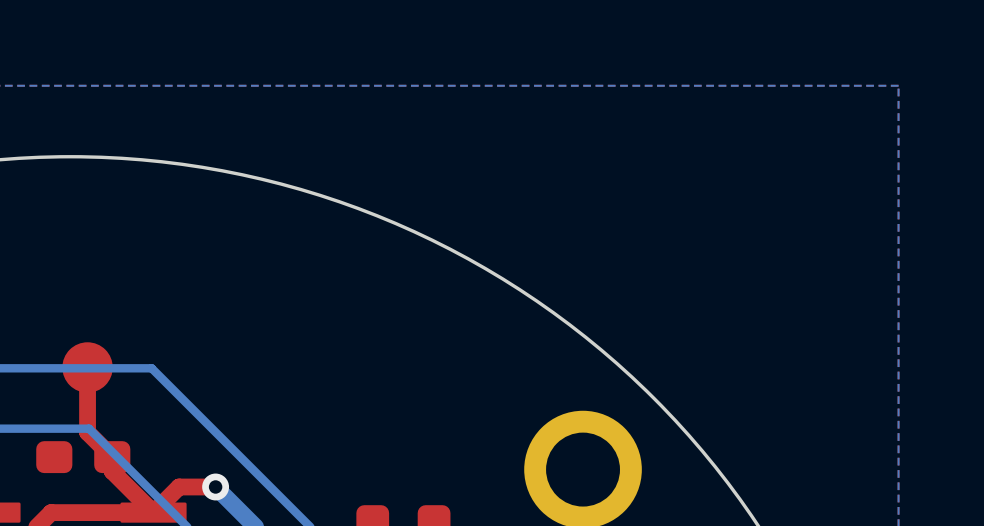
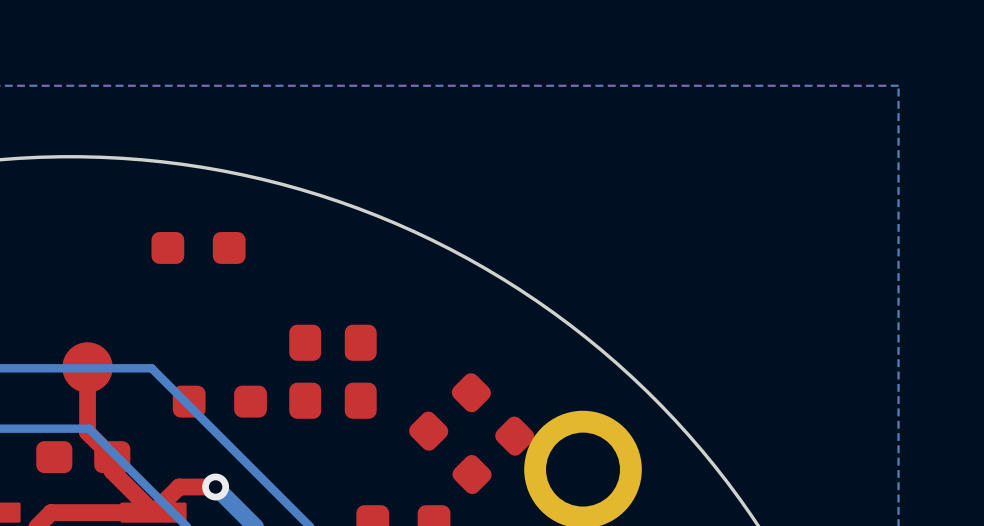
part: none -> (198, 247)
part: none -> (305, 371)
part: none -> (360, 371)
part: none -> (219, 401)
part: none -> (493, 414)
part: none -> (450, 452)

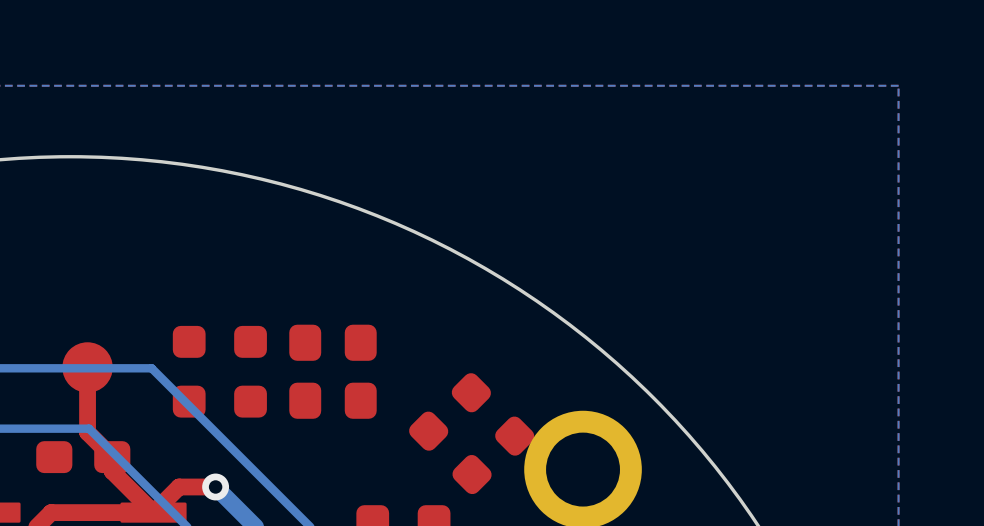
part position: (198, 247) -> (219, 341)

